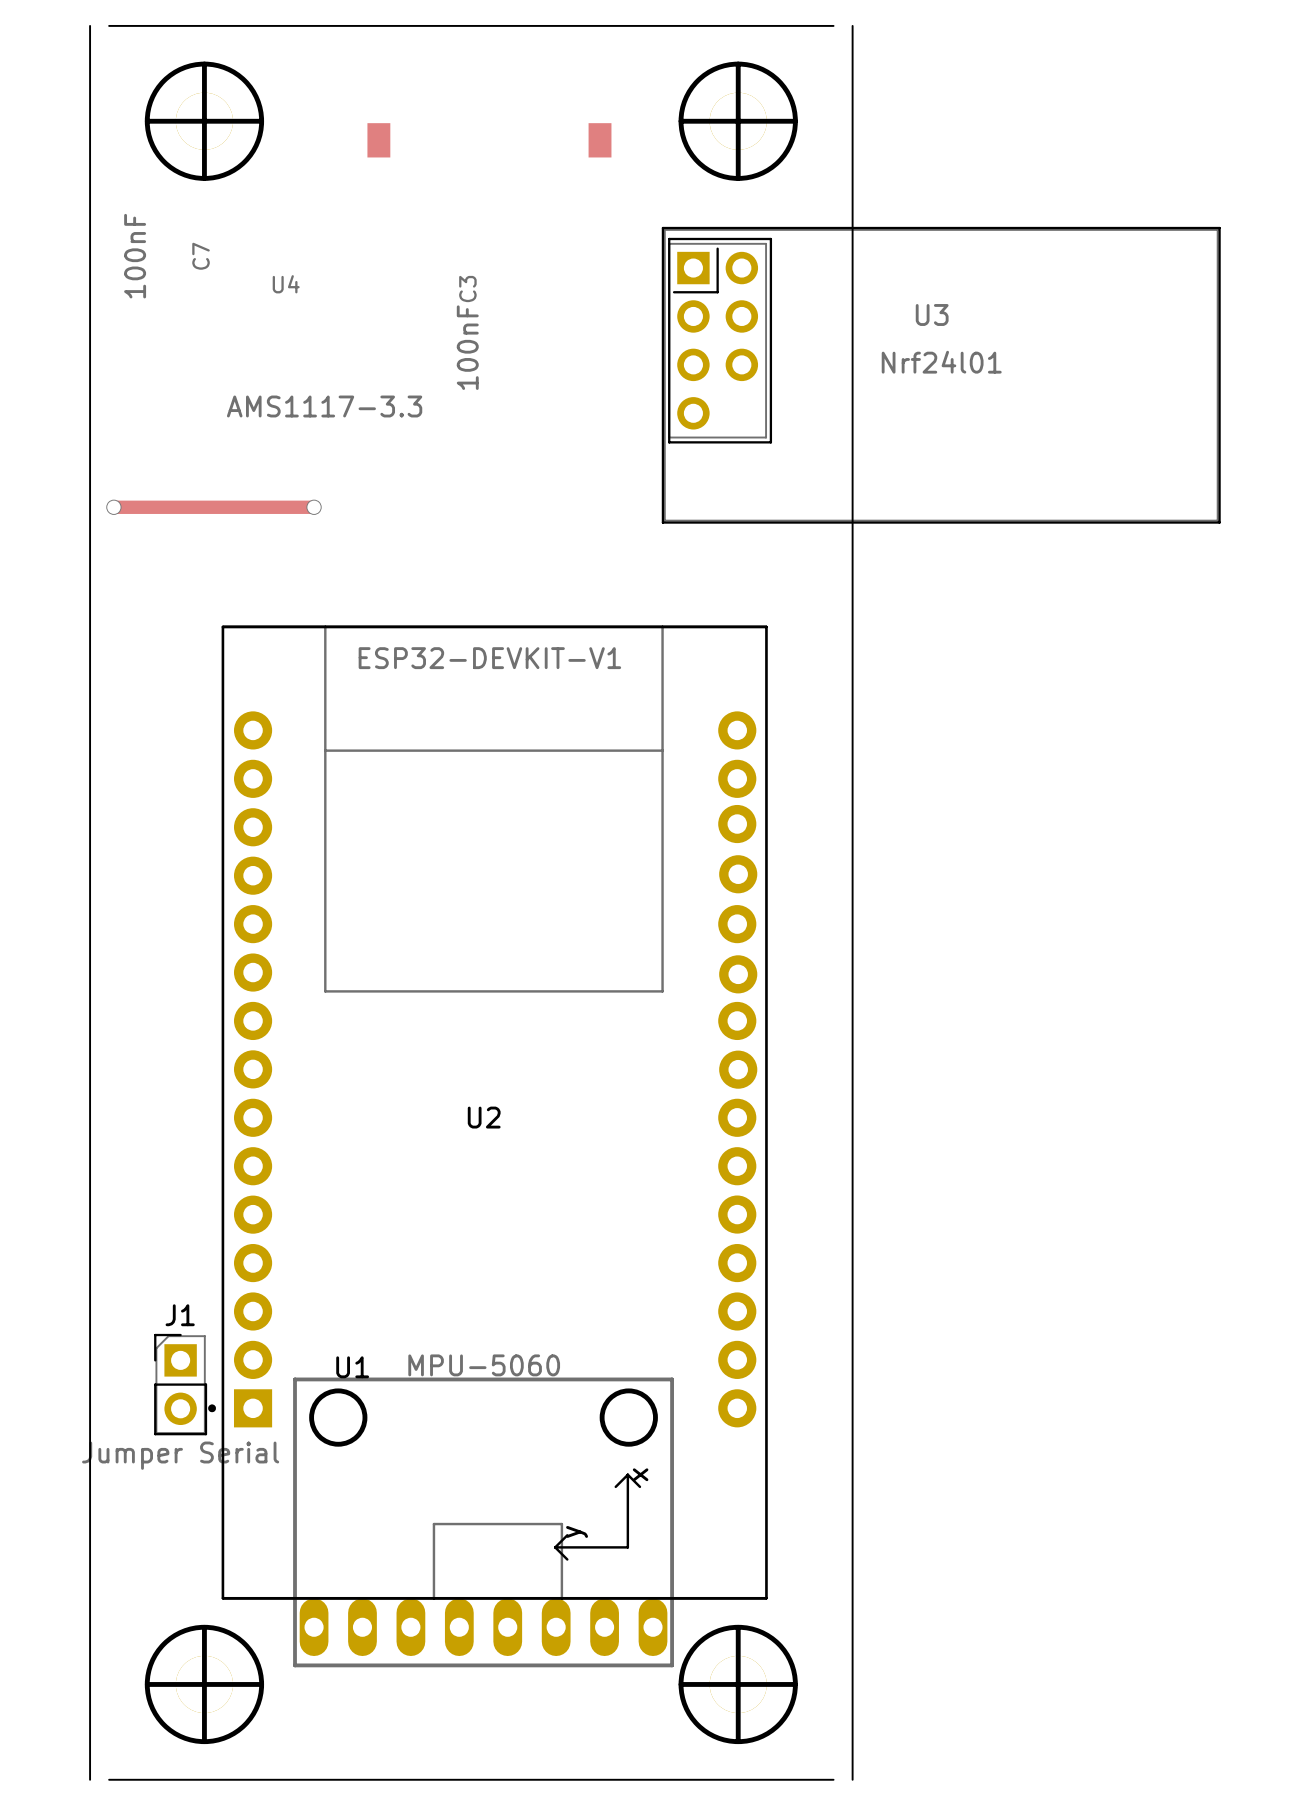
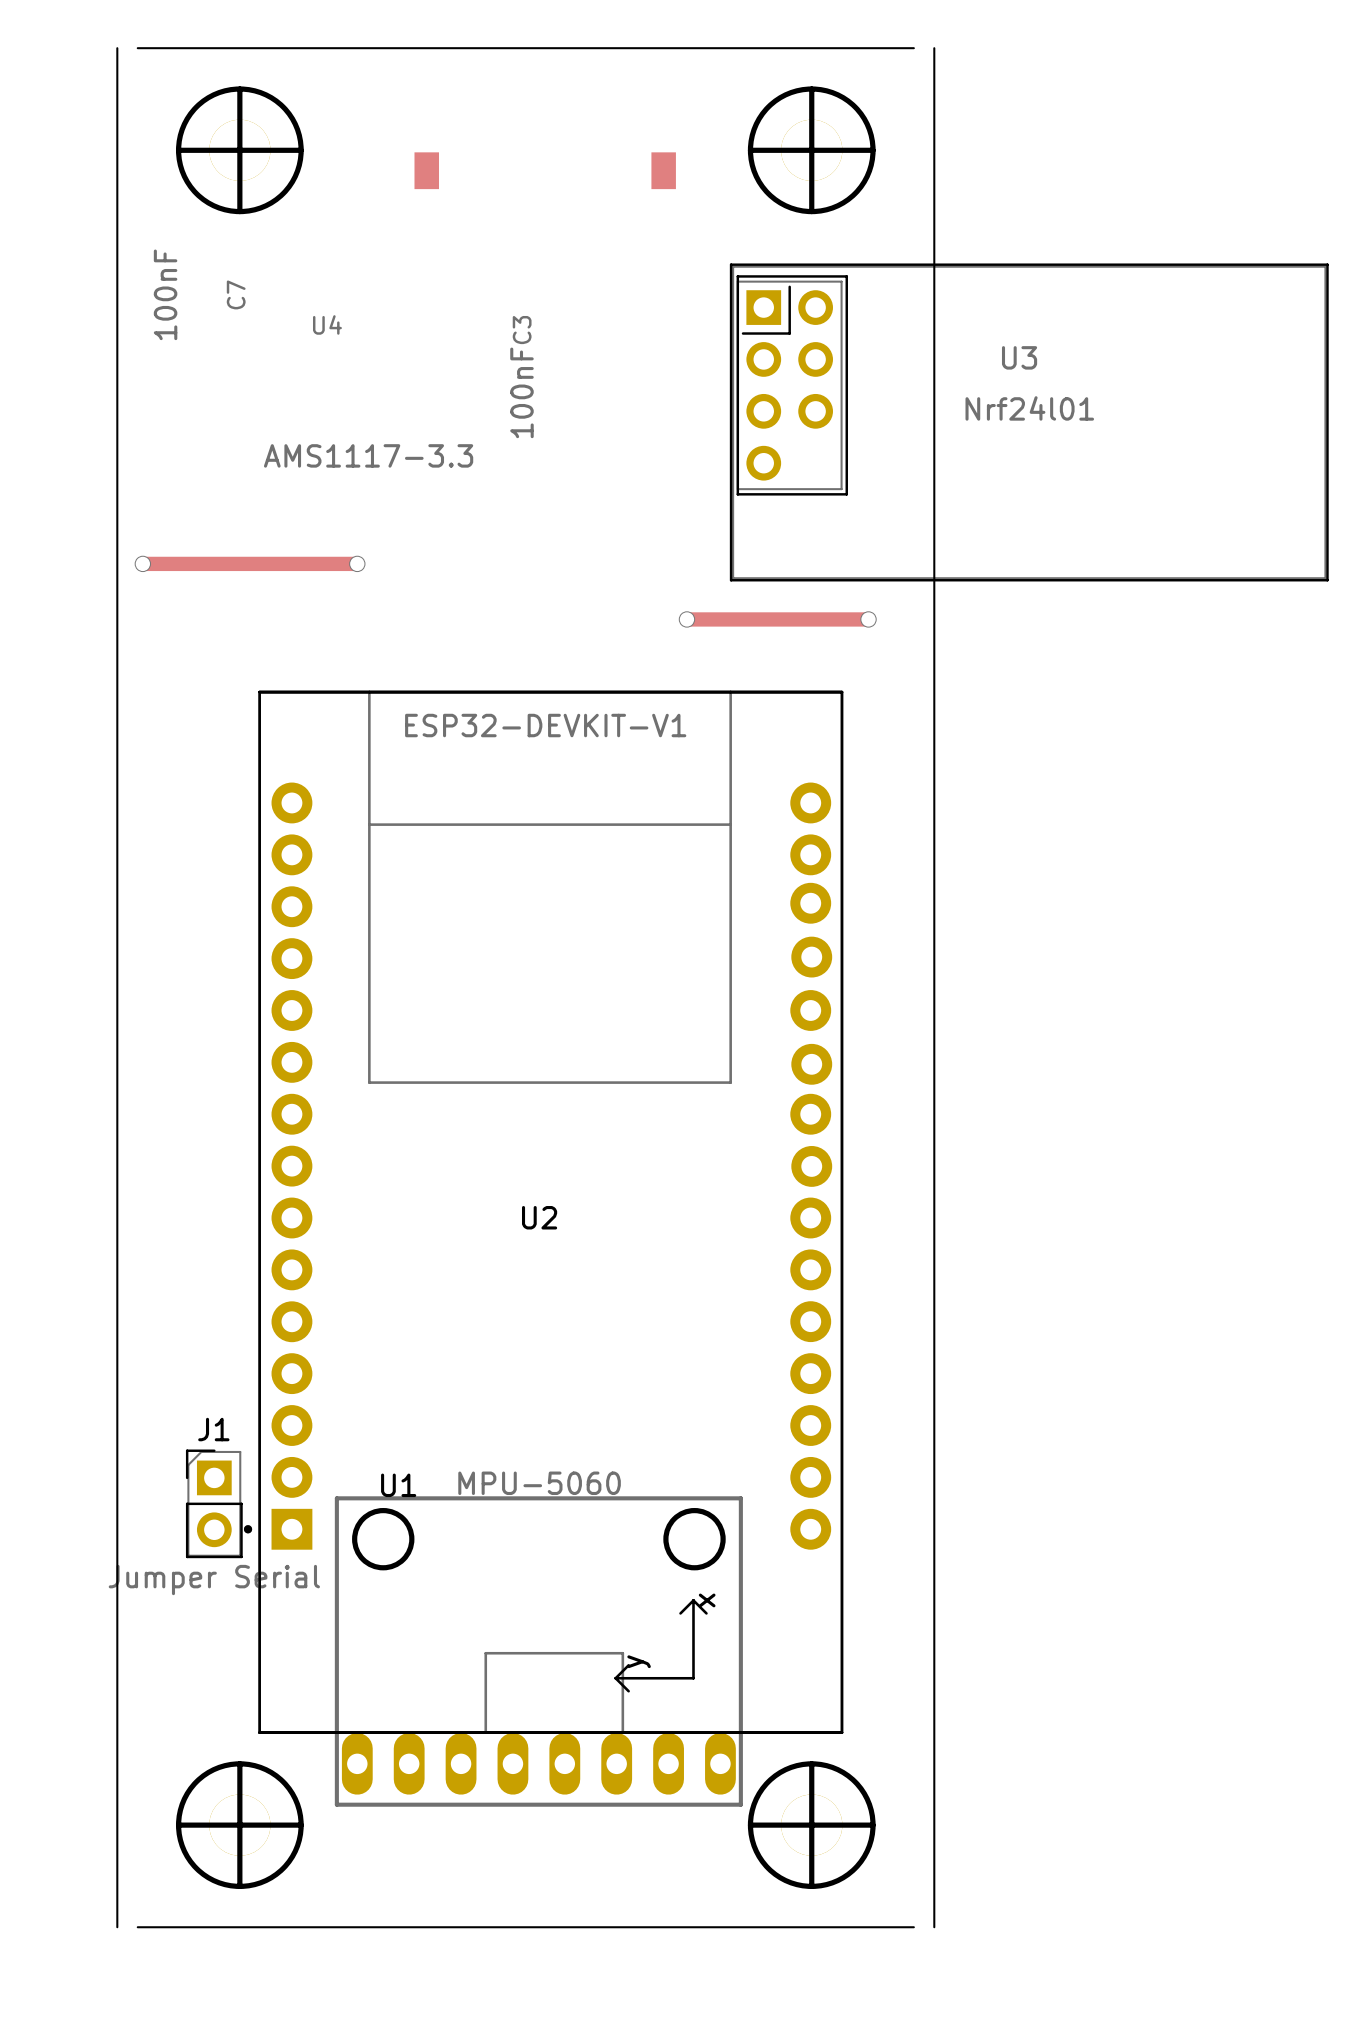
track: none -> (686, 619) (868, 619)
via: none -> (686, 619)
via: none -> (868, 619)

